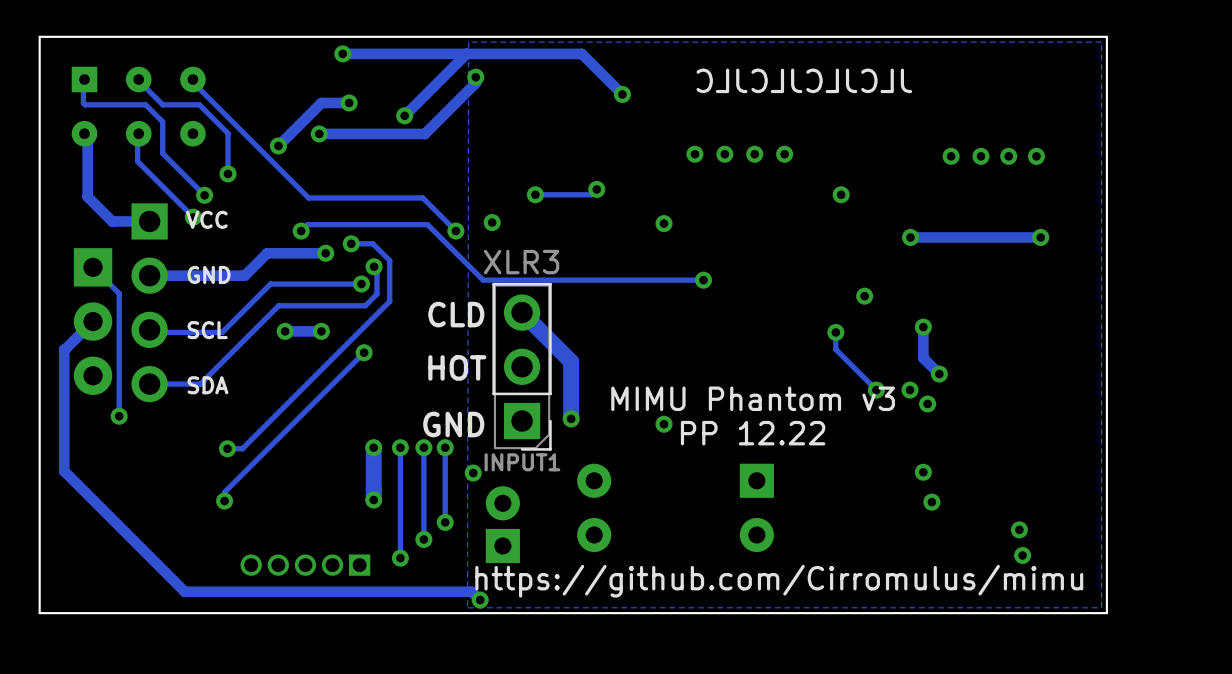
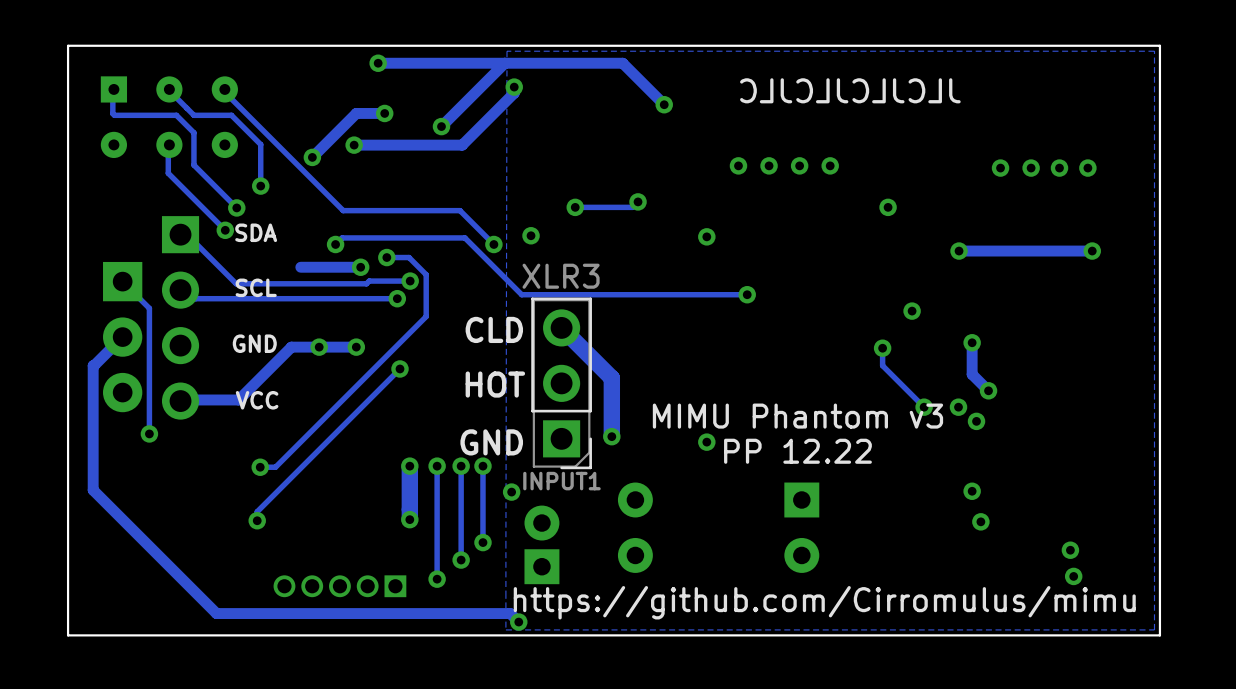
track: (87, 142) (87, 196) (112, 221) (149, 221) -> none
text: VCC (206, 219) -> SDA (256, 232)
track: none -> (185, 233) (236, 283) (366, 283) (369, 281) (410, 281)
track: (267, 253) (244, 275) (149, 275) -> none
track: (376, 269) (376, 294) (365, 305) (278, 305) (200, 384) (149, 384) -> none
text: GND (209, 274) -> SCL (256, 287)
track: (270, 284) (222, 332) (158, 332) -> (304, 298) (195, 298) (185, 289)
text: SCL (207, 330) -> GND (254, 343)
track: none -> (319, 347) (291, 347) (238, 399) (185, 399)
text: SDA (207, 385) -> VCC (257, 400)

